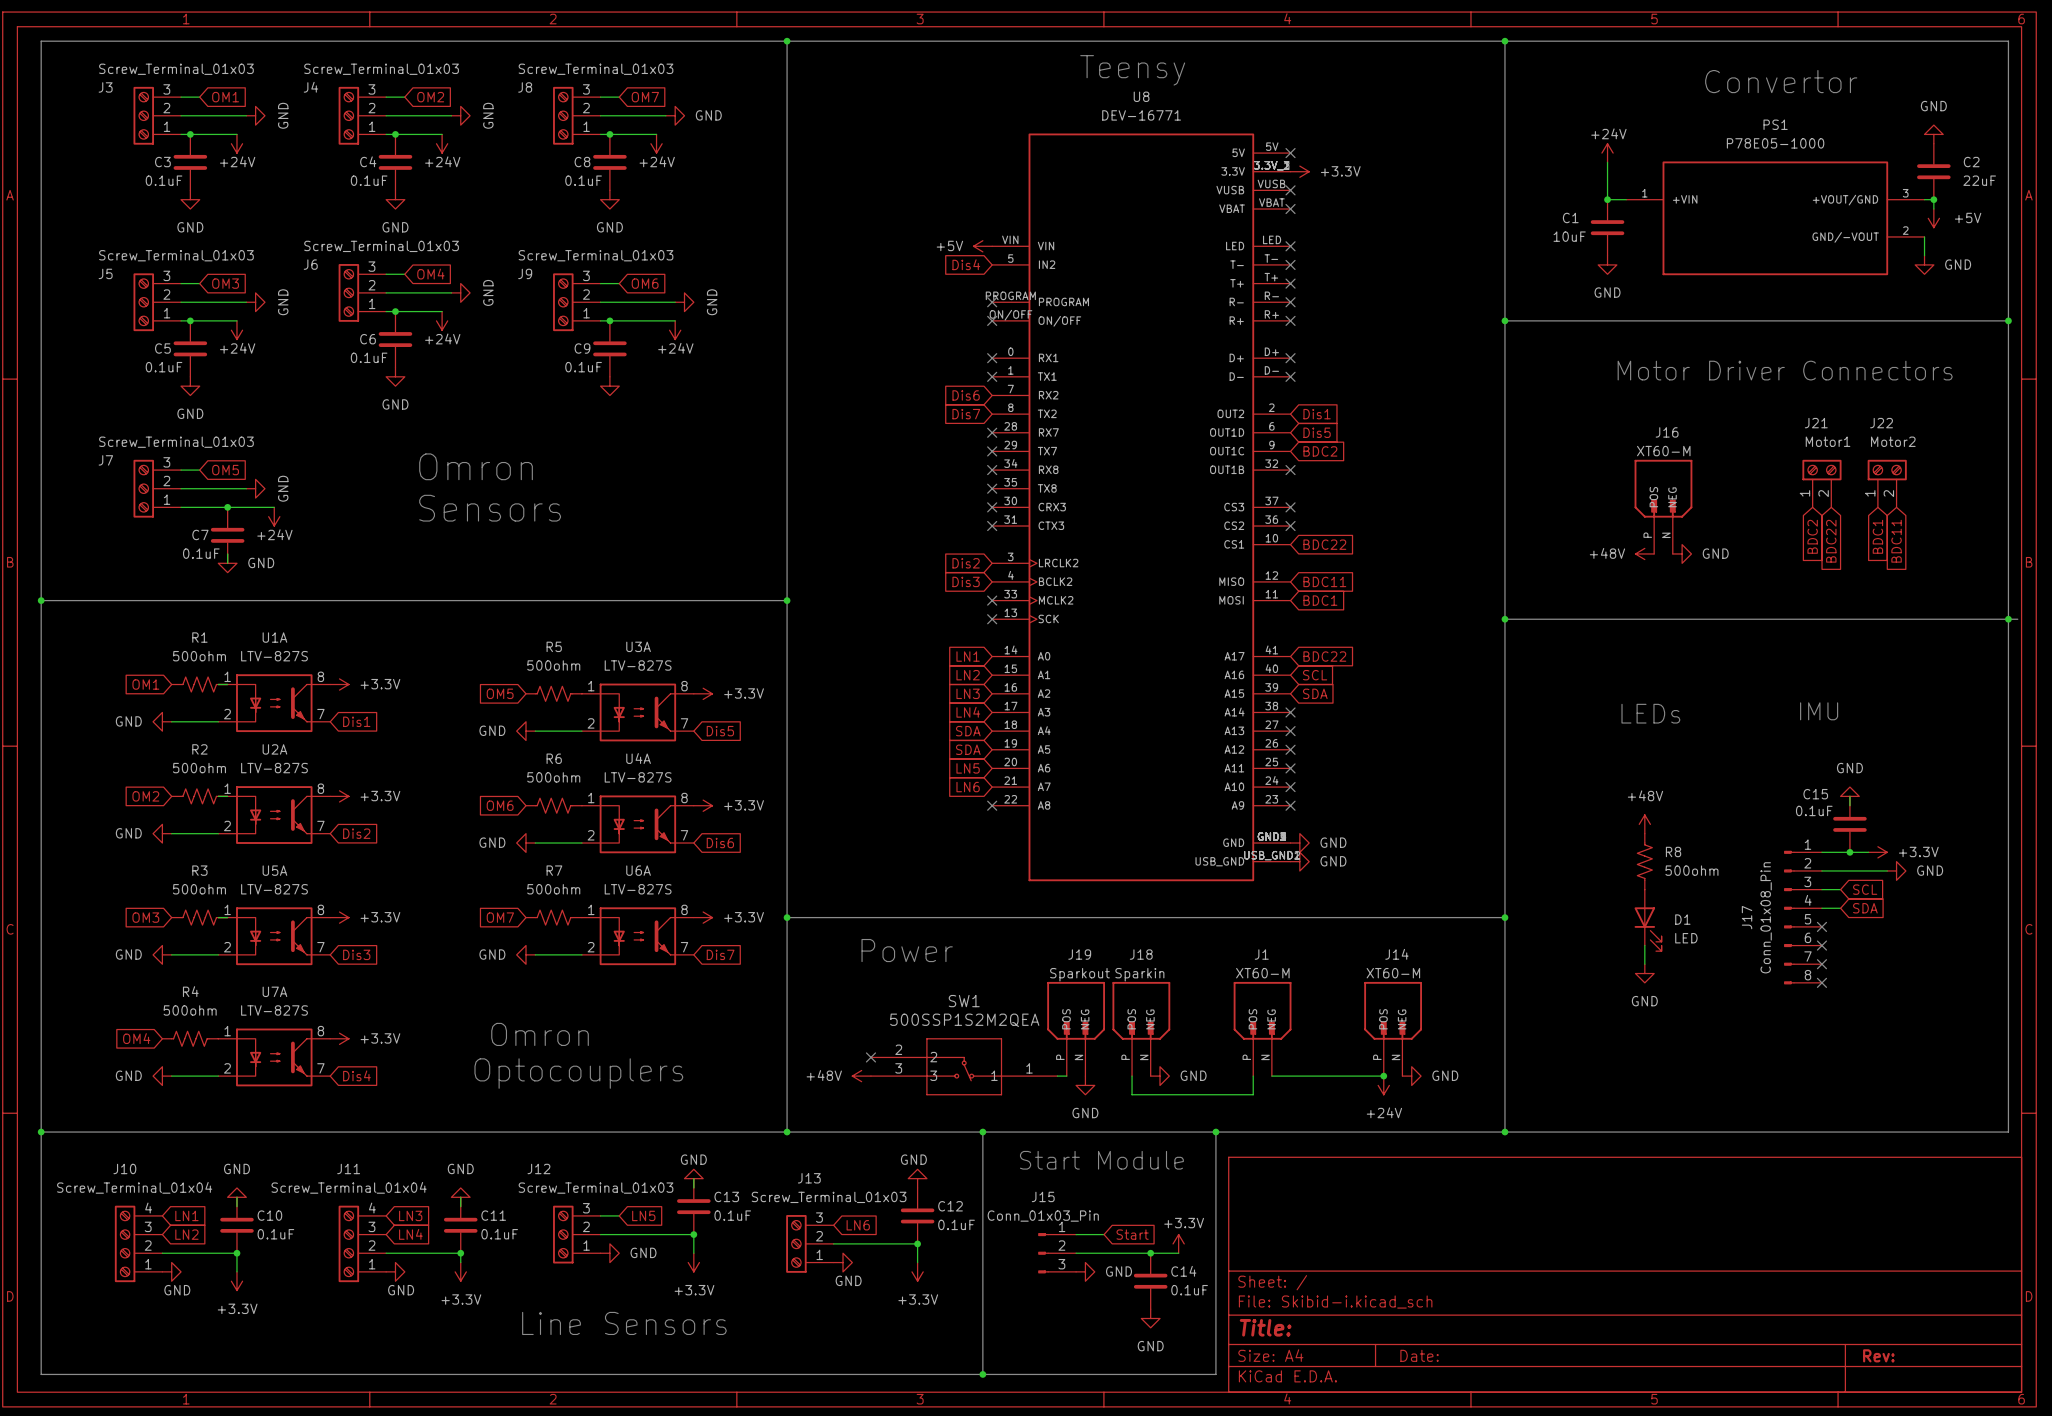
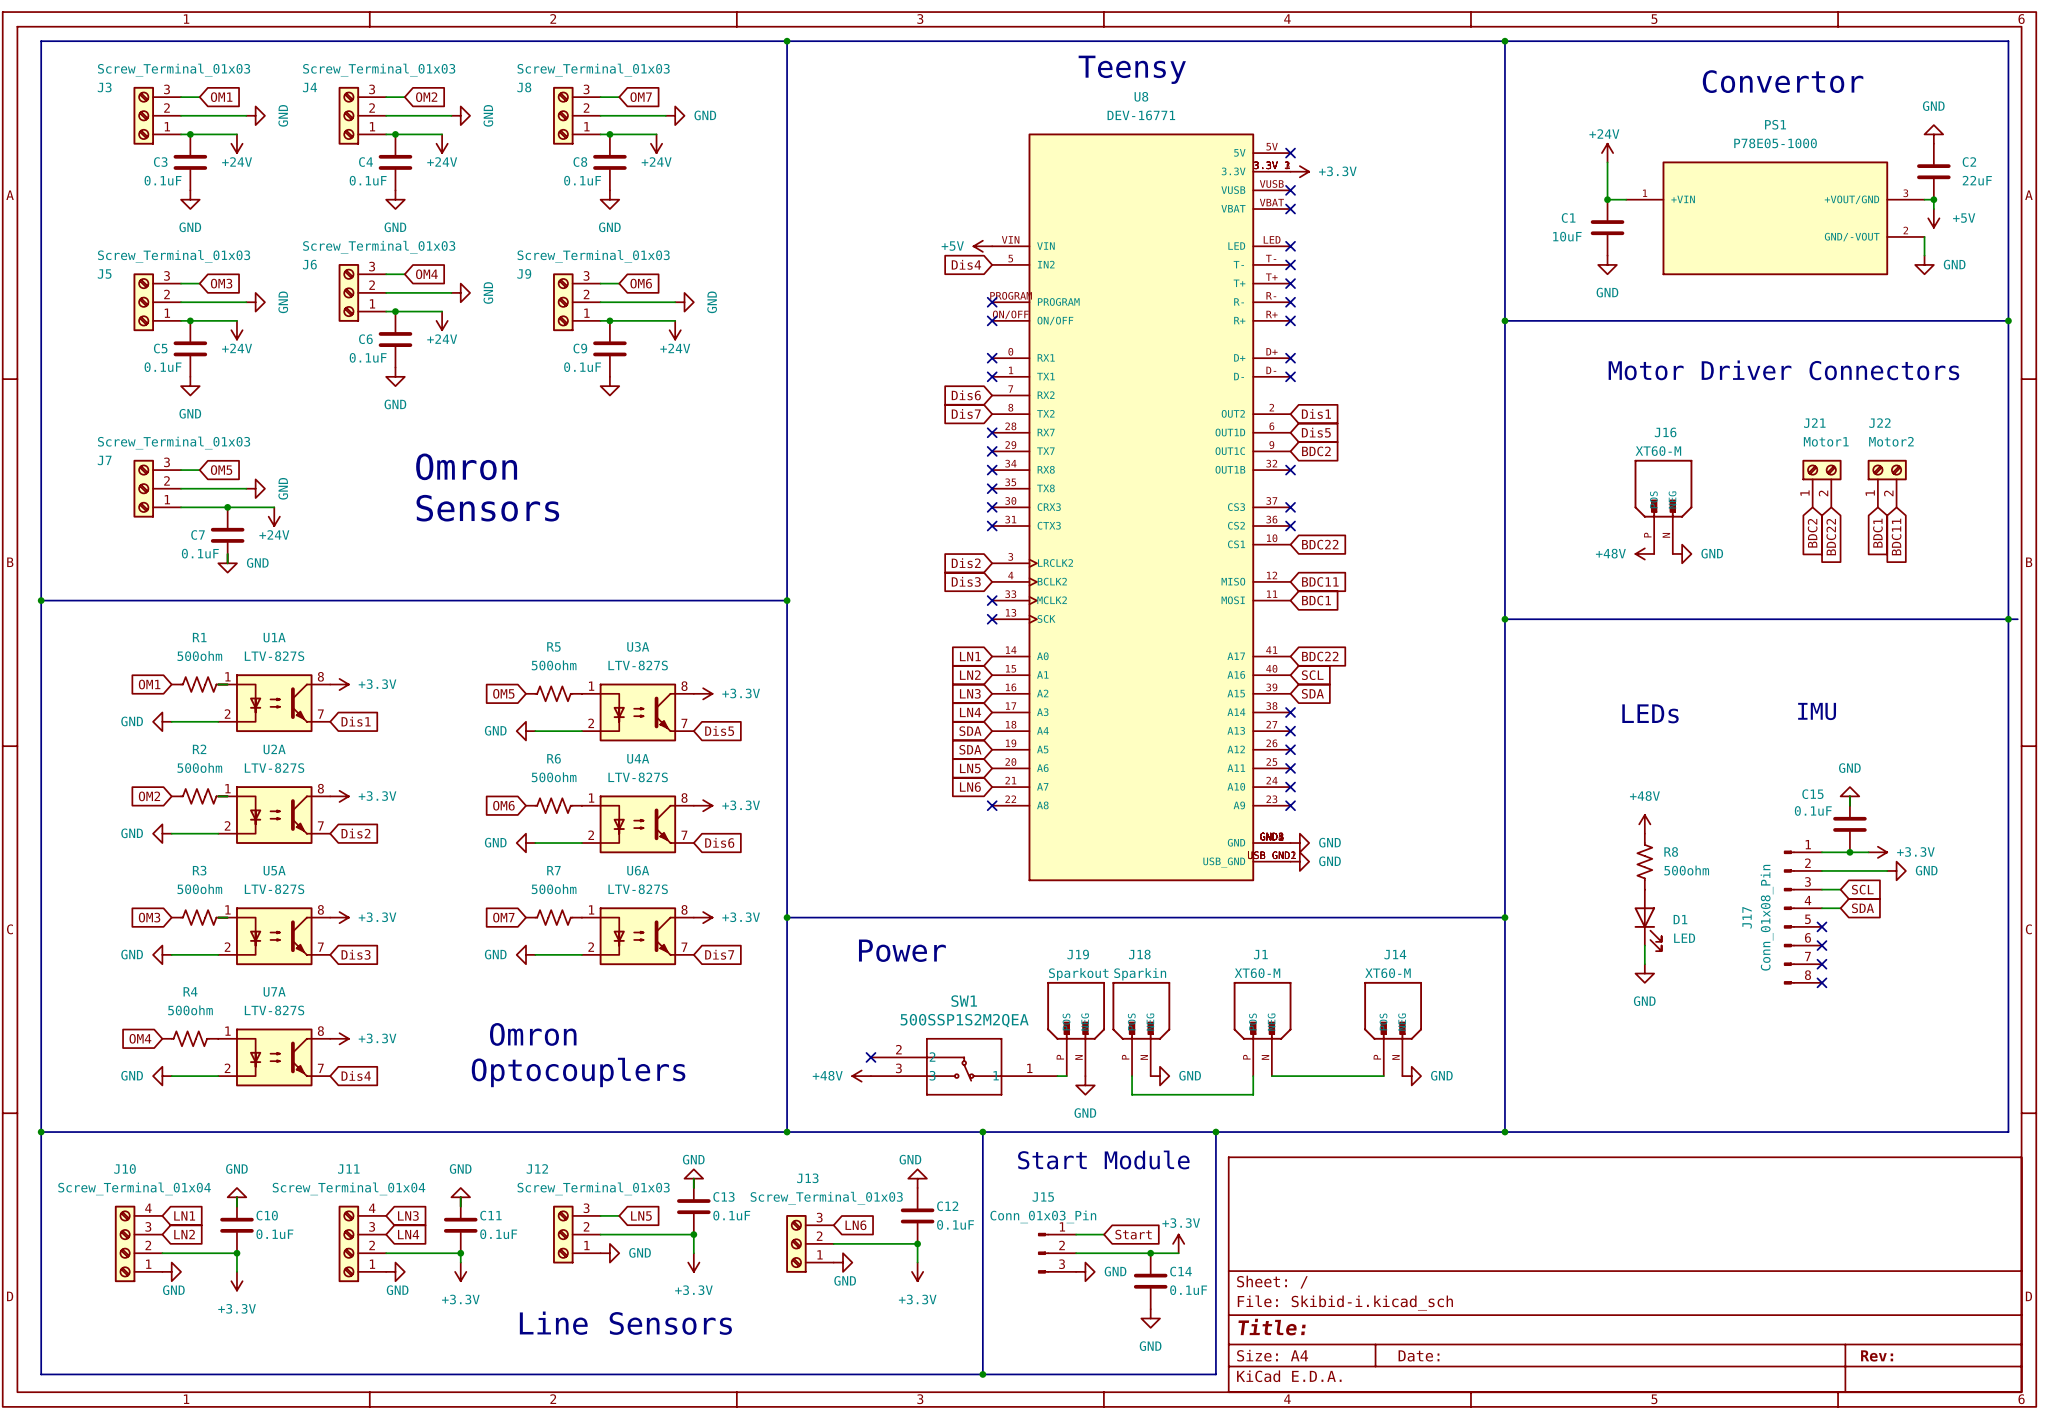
junction: (1383, 1076) -> none
power symbol: +24V (1383, 1085) -> none

